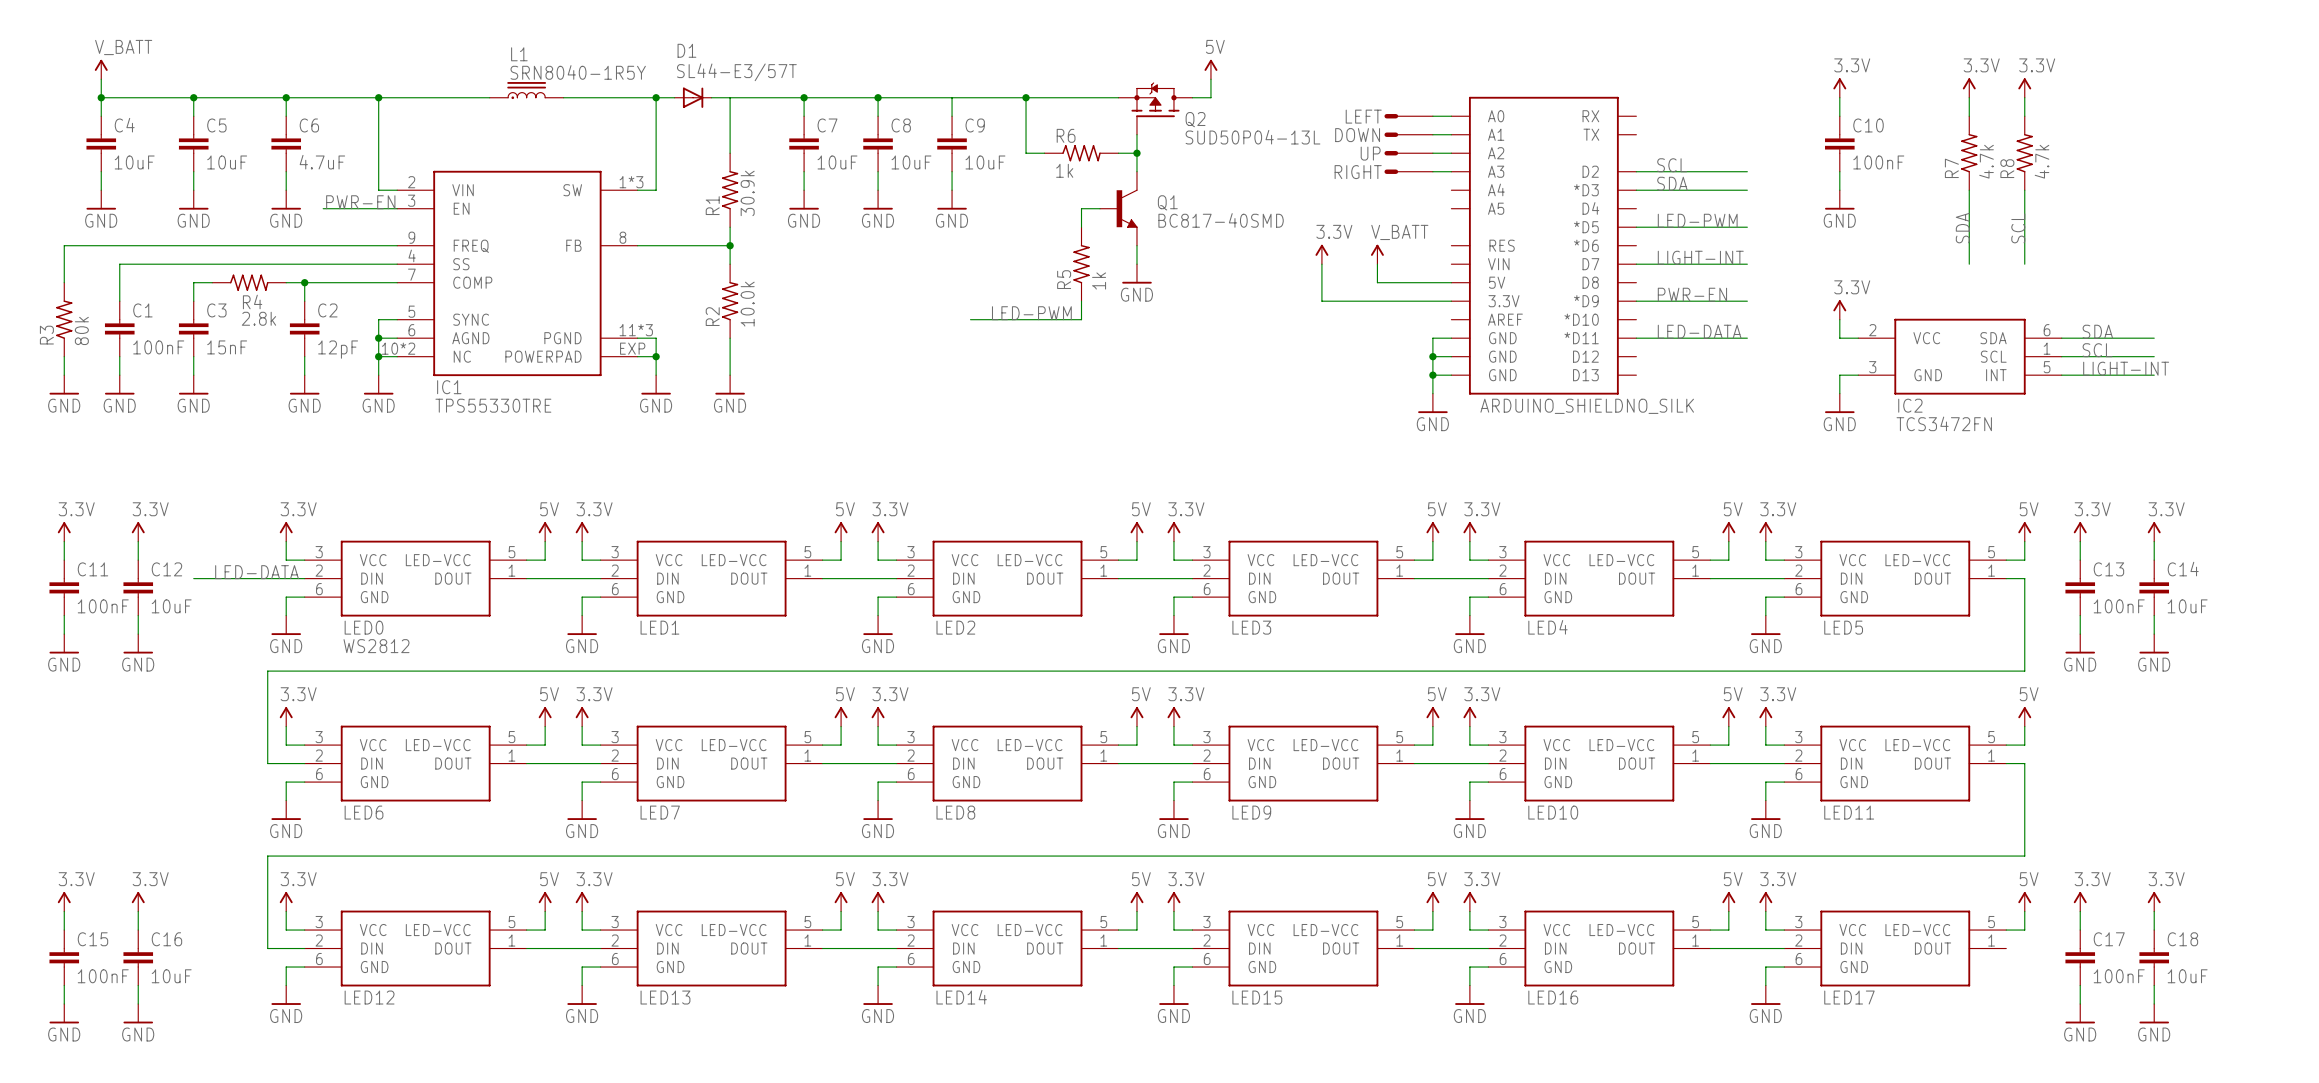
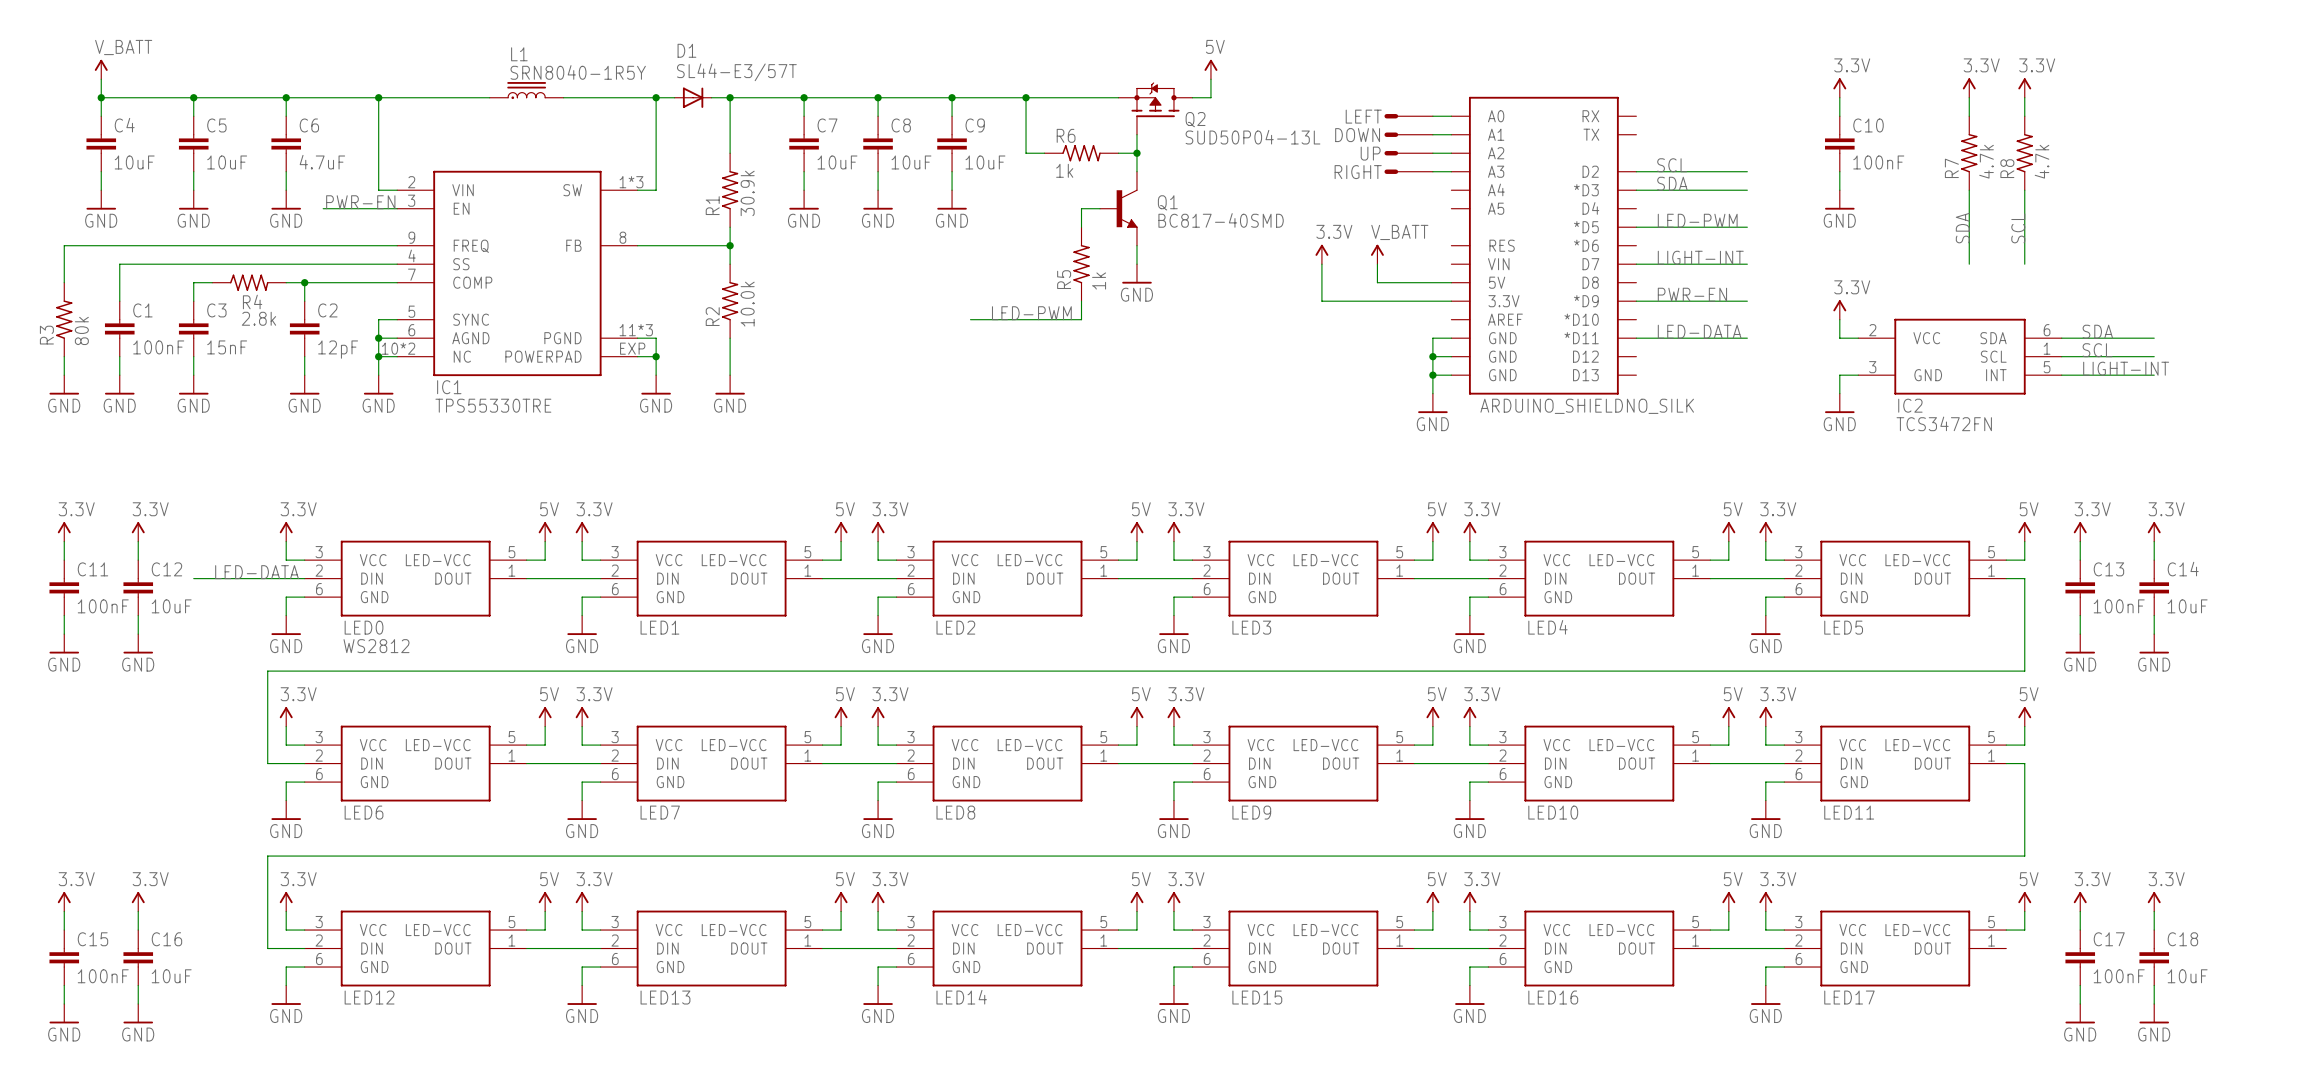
junction: none -> (730, 97)
junction: none -> (952, 97)

